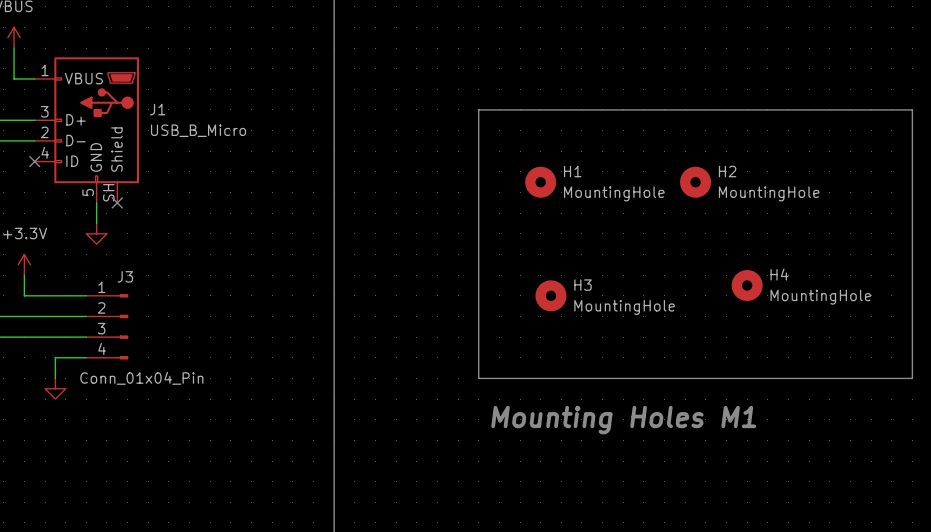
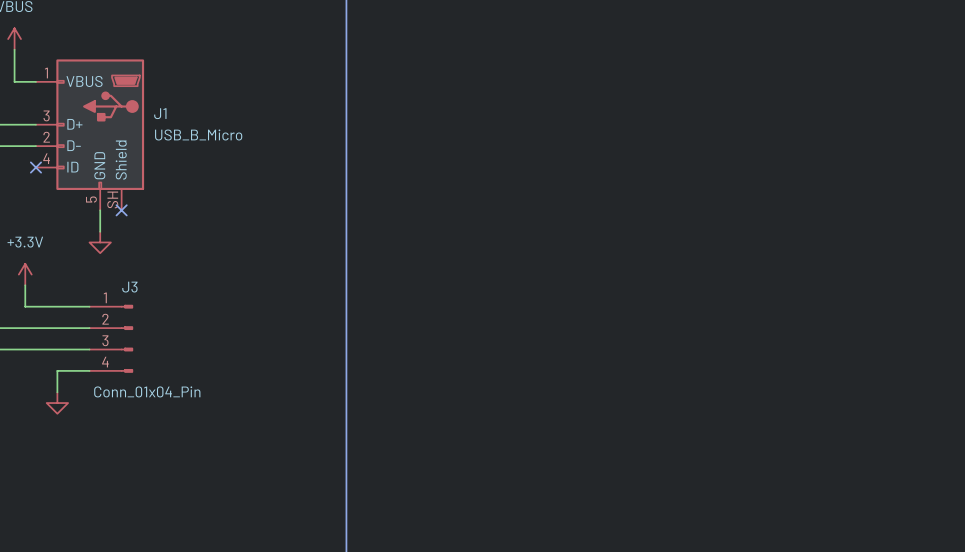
line: (478, 109) (912, 109) (912, 378) (478, 378) (478, 109) -> none
H1: MountingHole (540, 182) -> none
H2: MountingHole (695, 182) -> none
H4: MountingHole (747, 285) -> none
H3: MountingHole (550, 295) -> none
text: Mounting Holes M1 (623, 420) -> none

